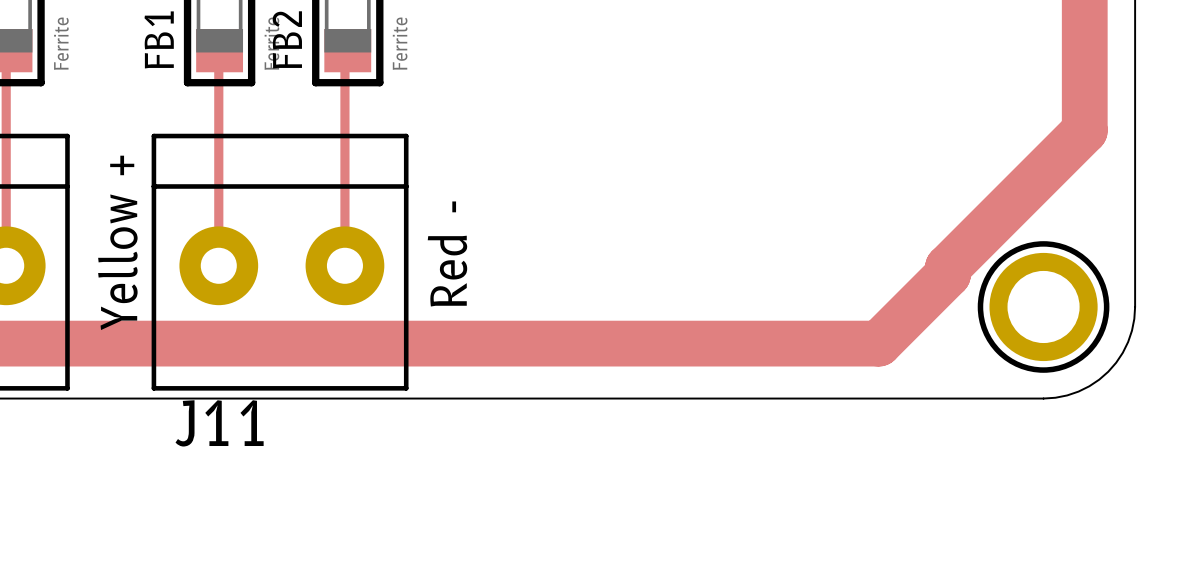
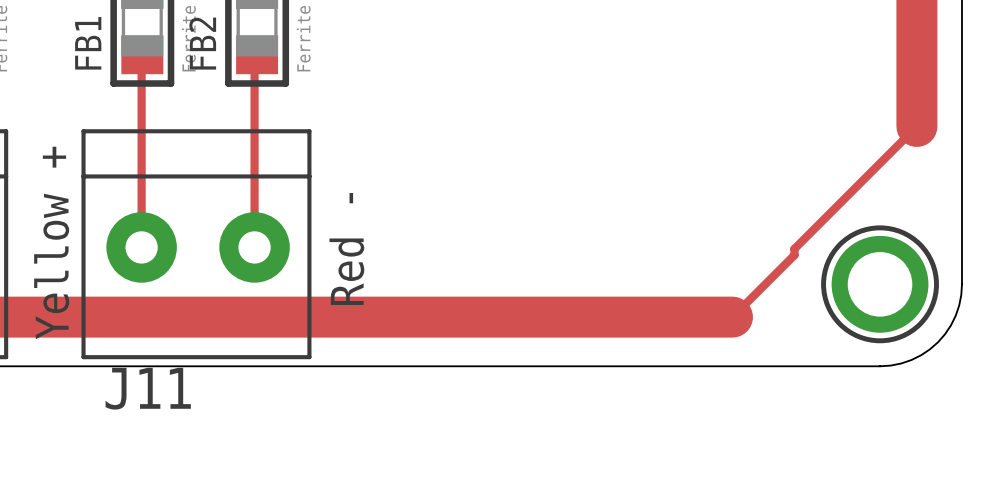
track width: thick (1084, 130) (948, 267) (948, 274) (878, 343) -> thin (916, 126) (794, 248) (794, 255) (732, 317)

